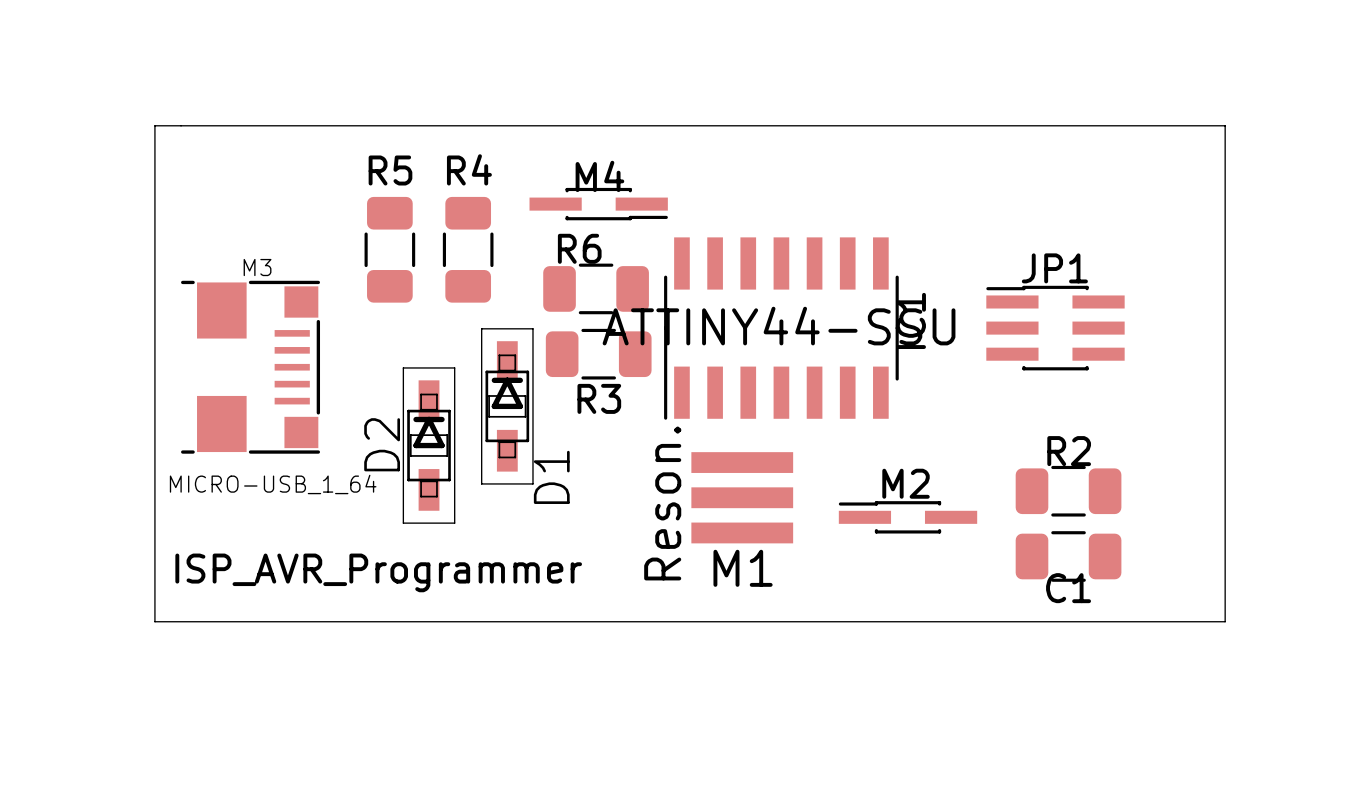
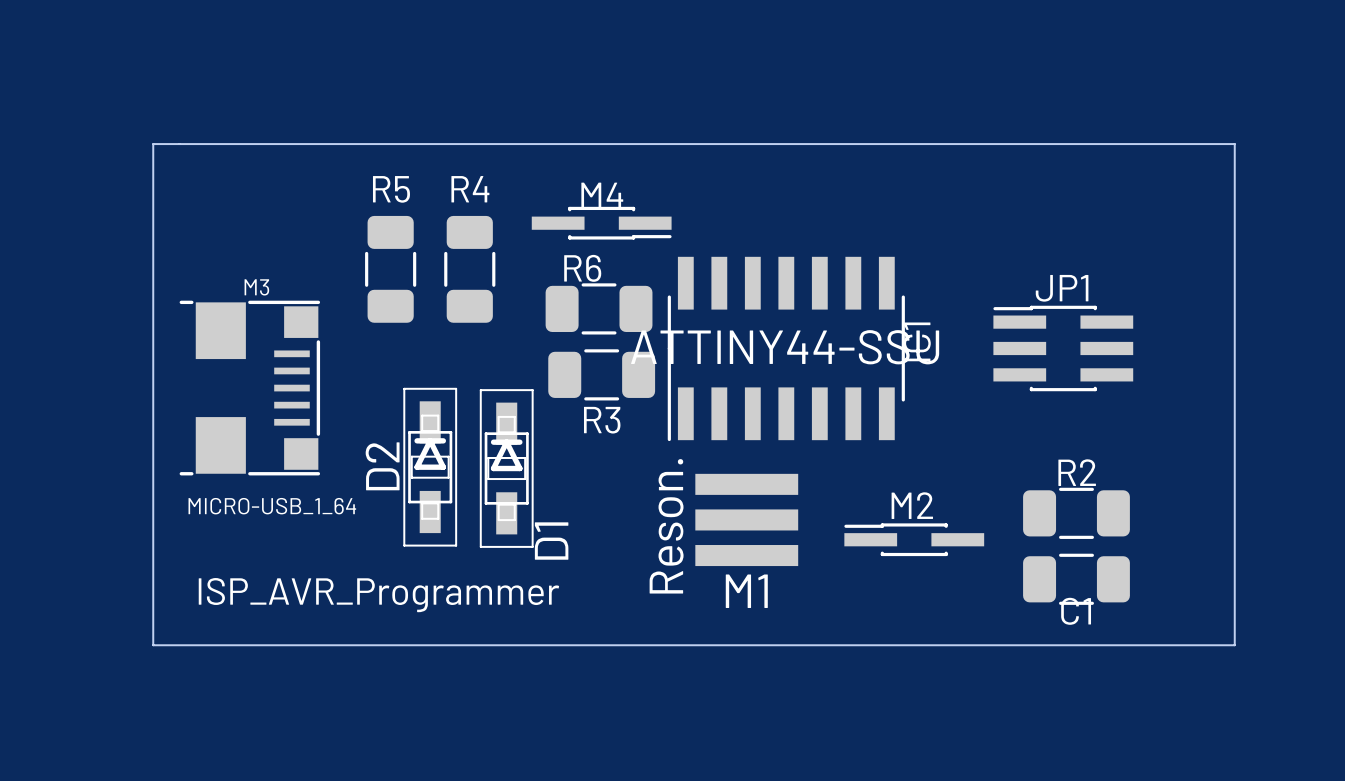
D1 position: (507, 406) -> (506, 468)

